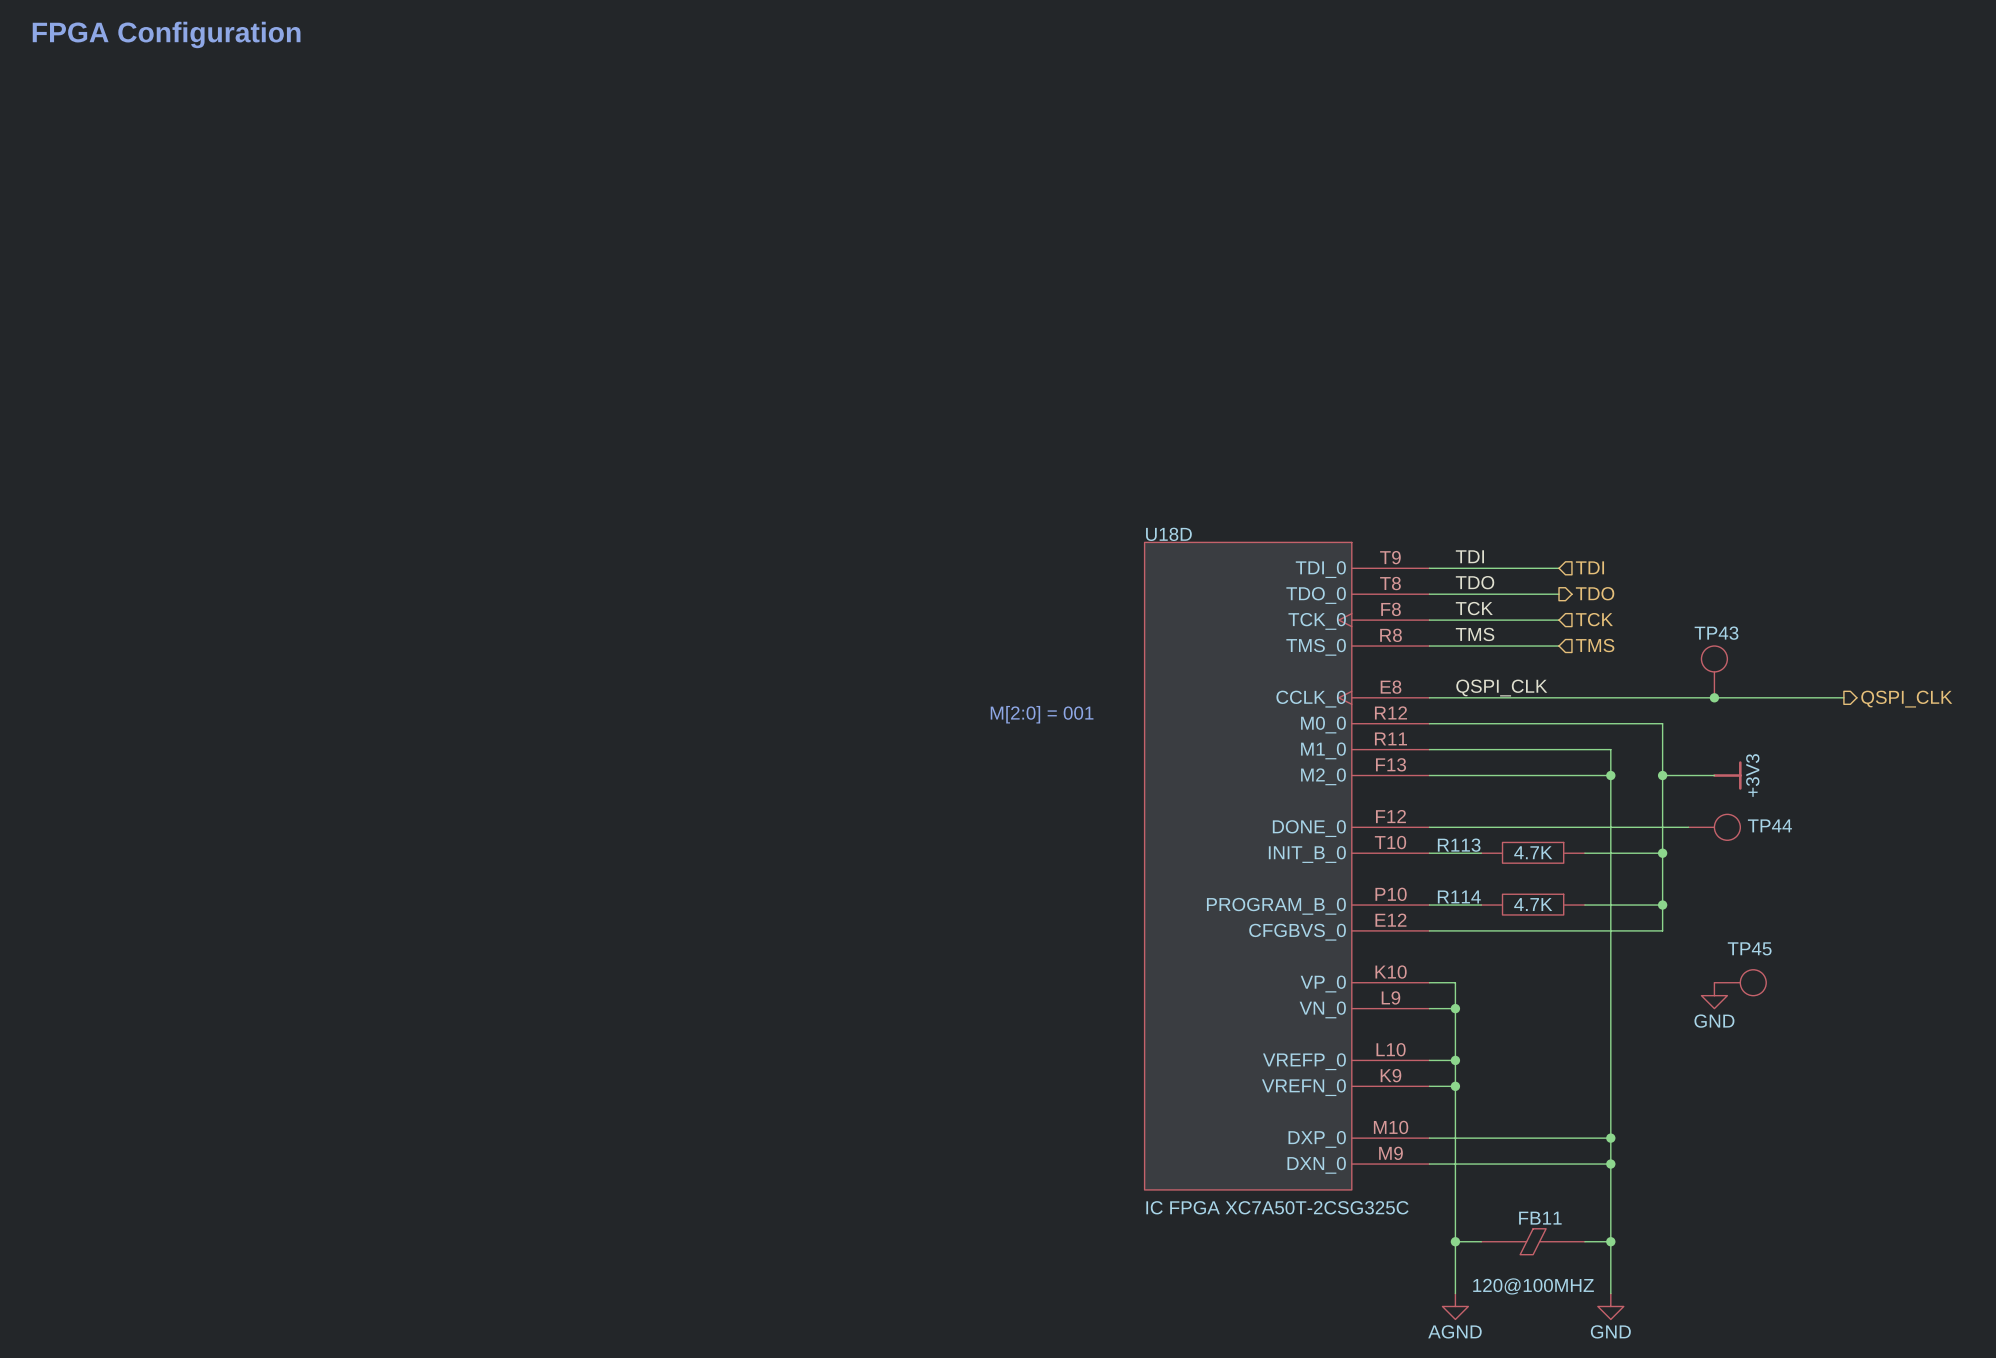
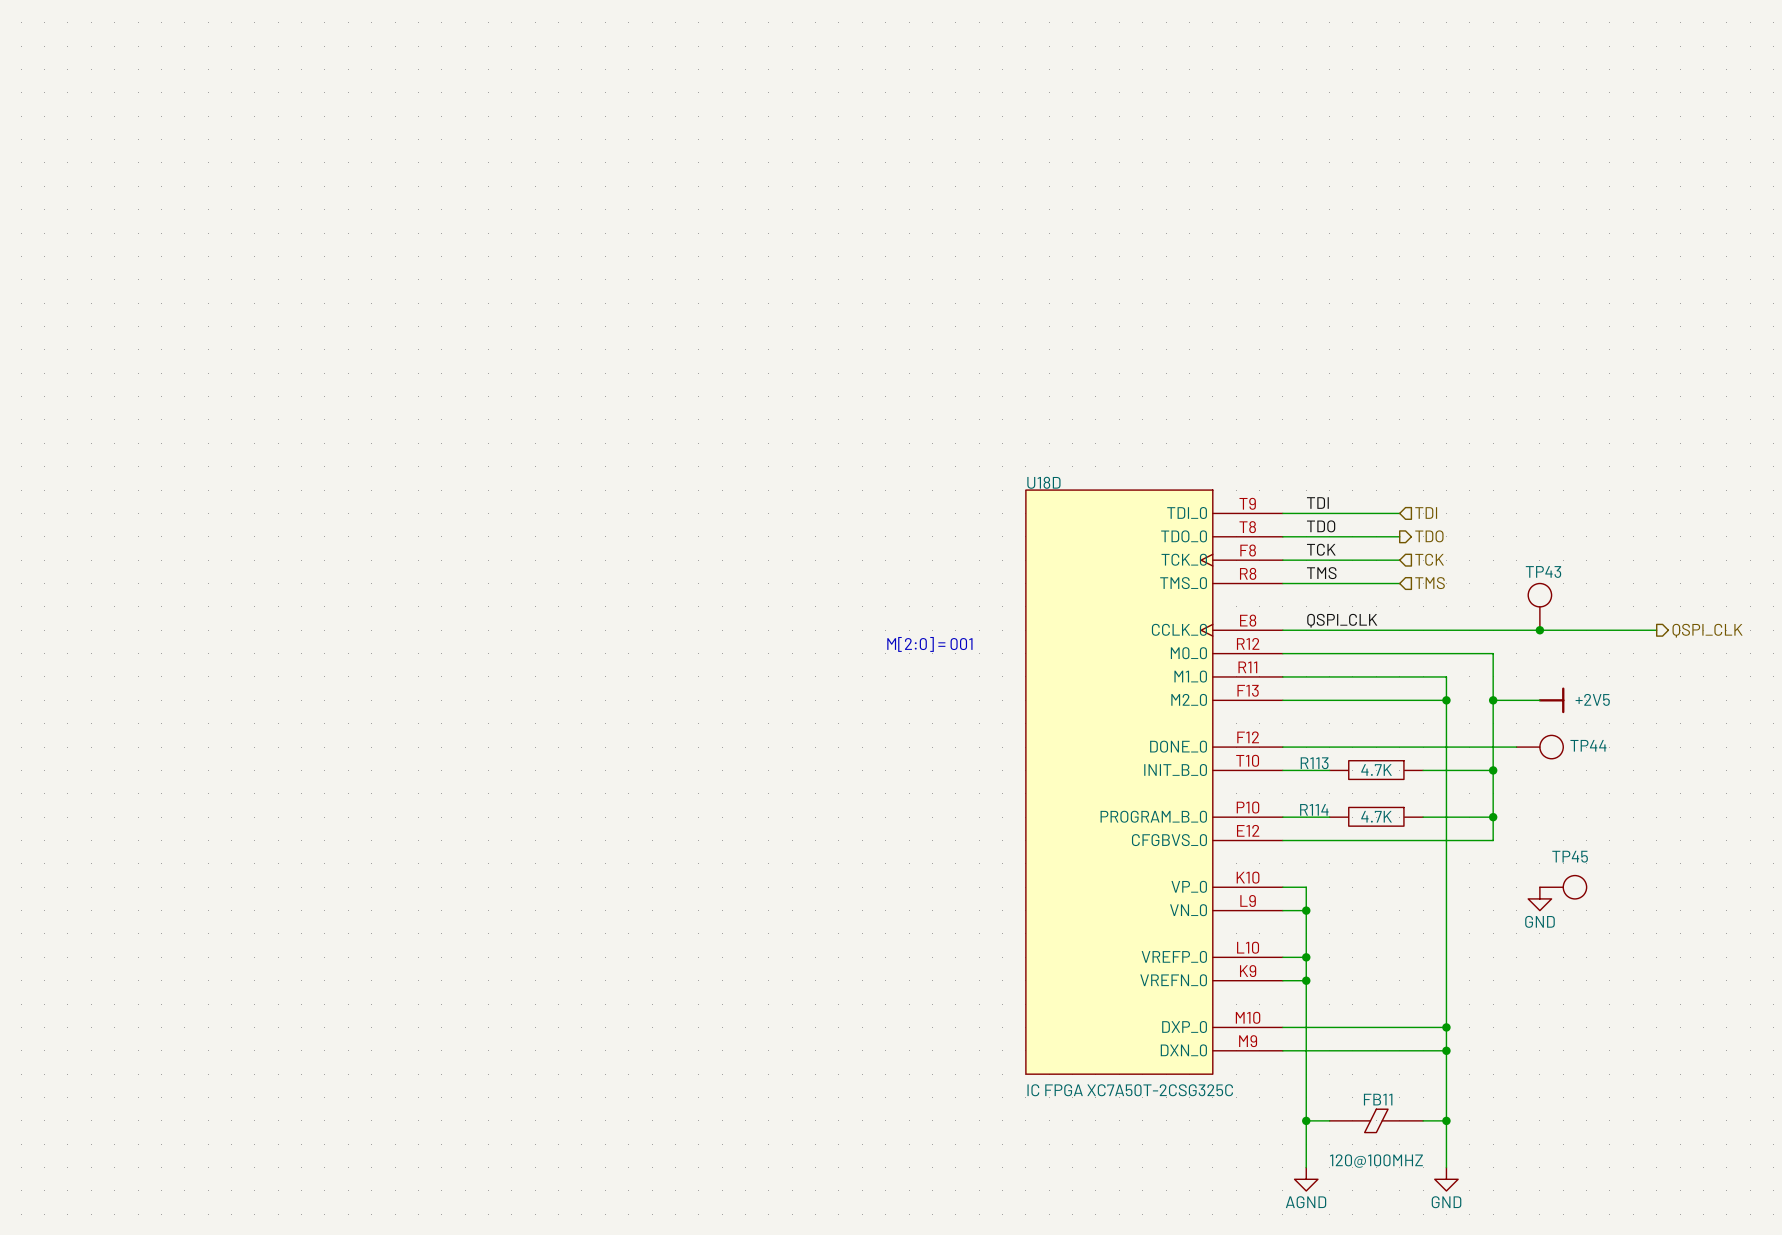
text: FPGA Configuration (166, 34) -> none
power symbol: +3V3 (1727, 775) -> +2V5 (1551, 700)

